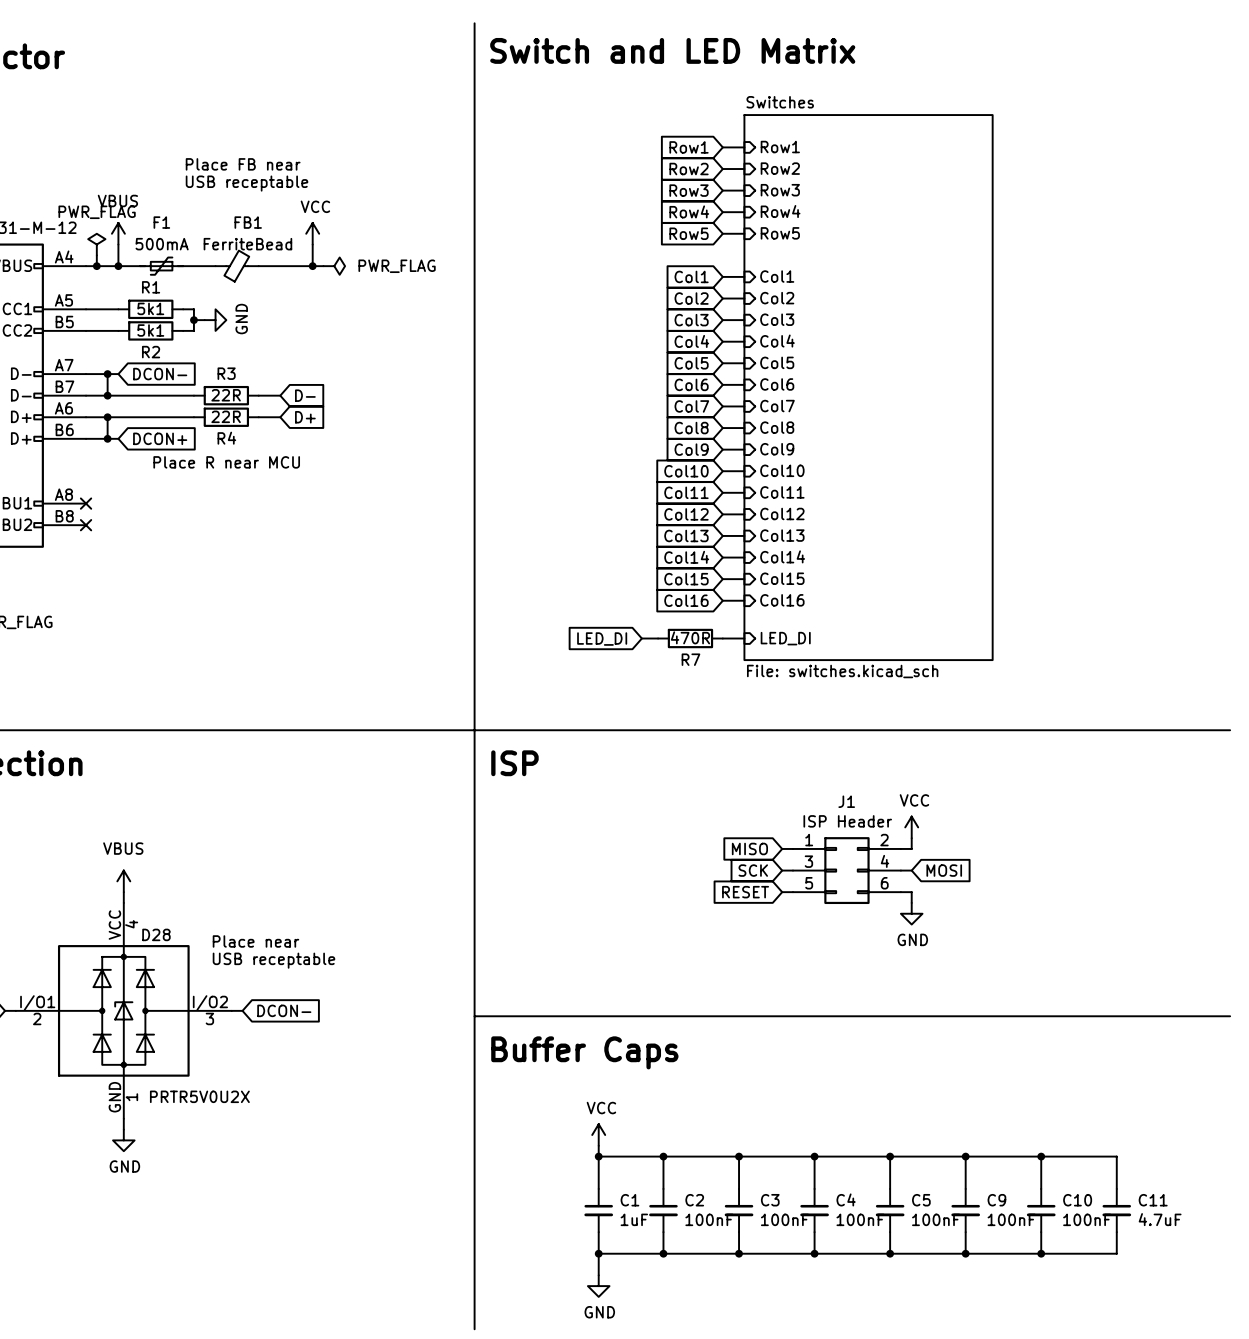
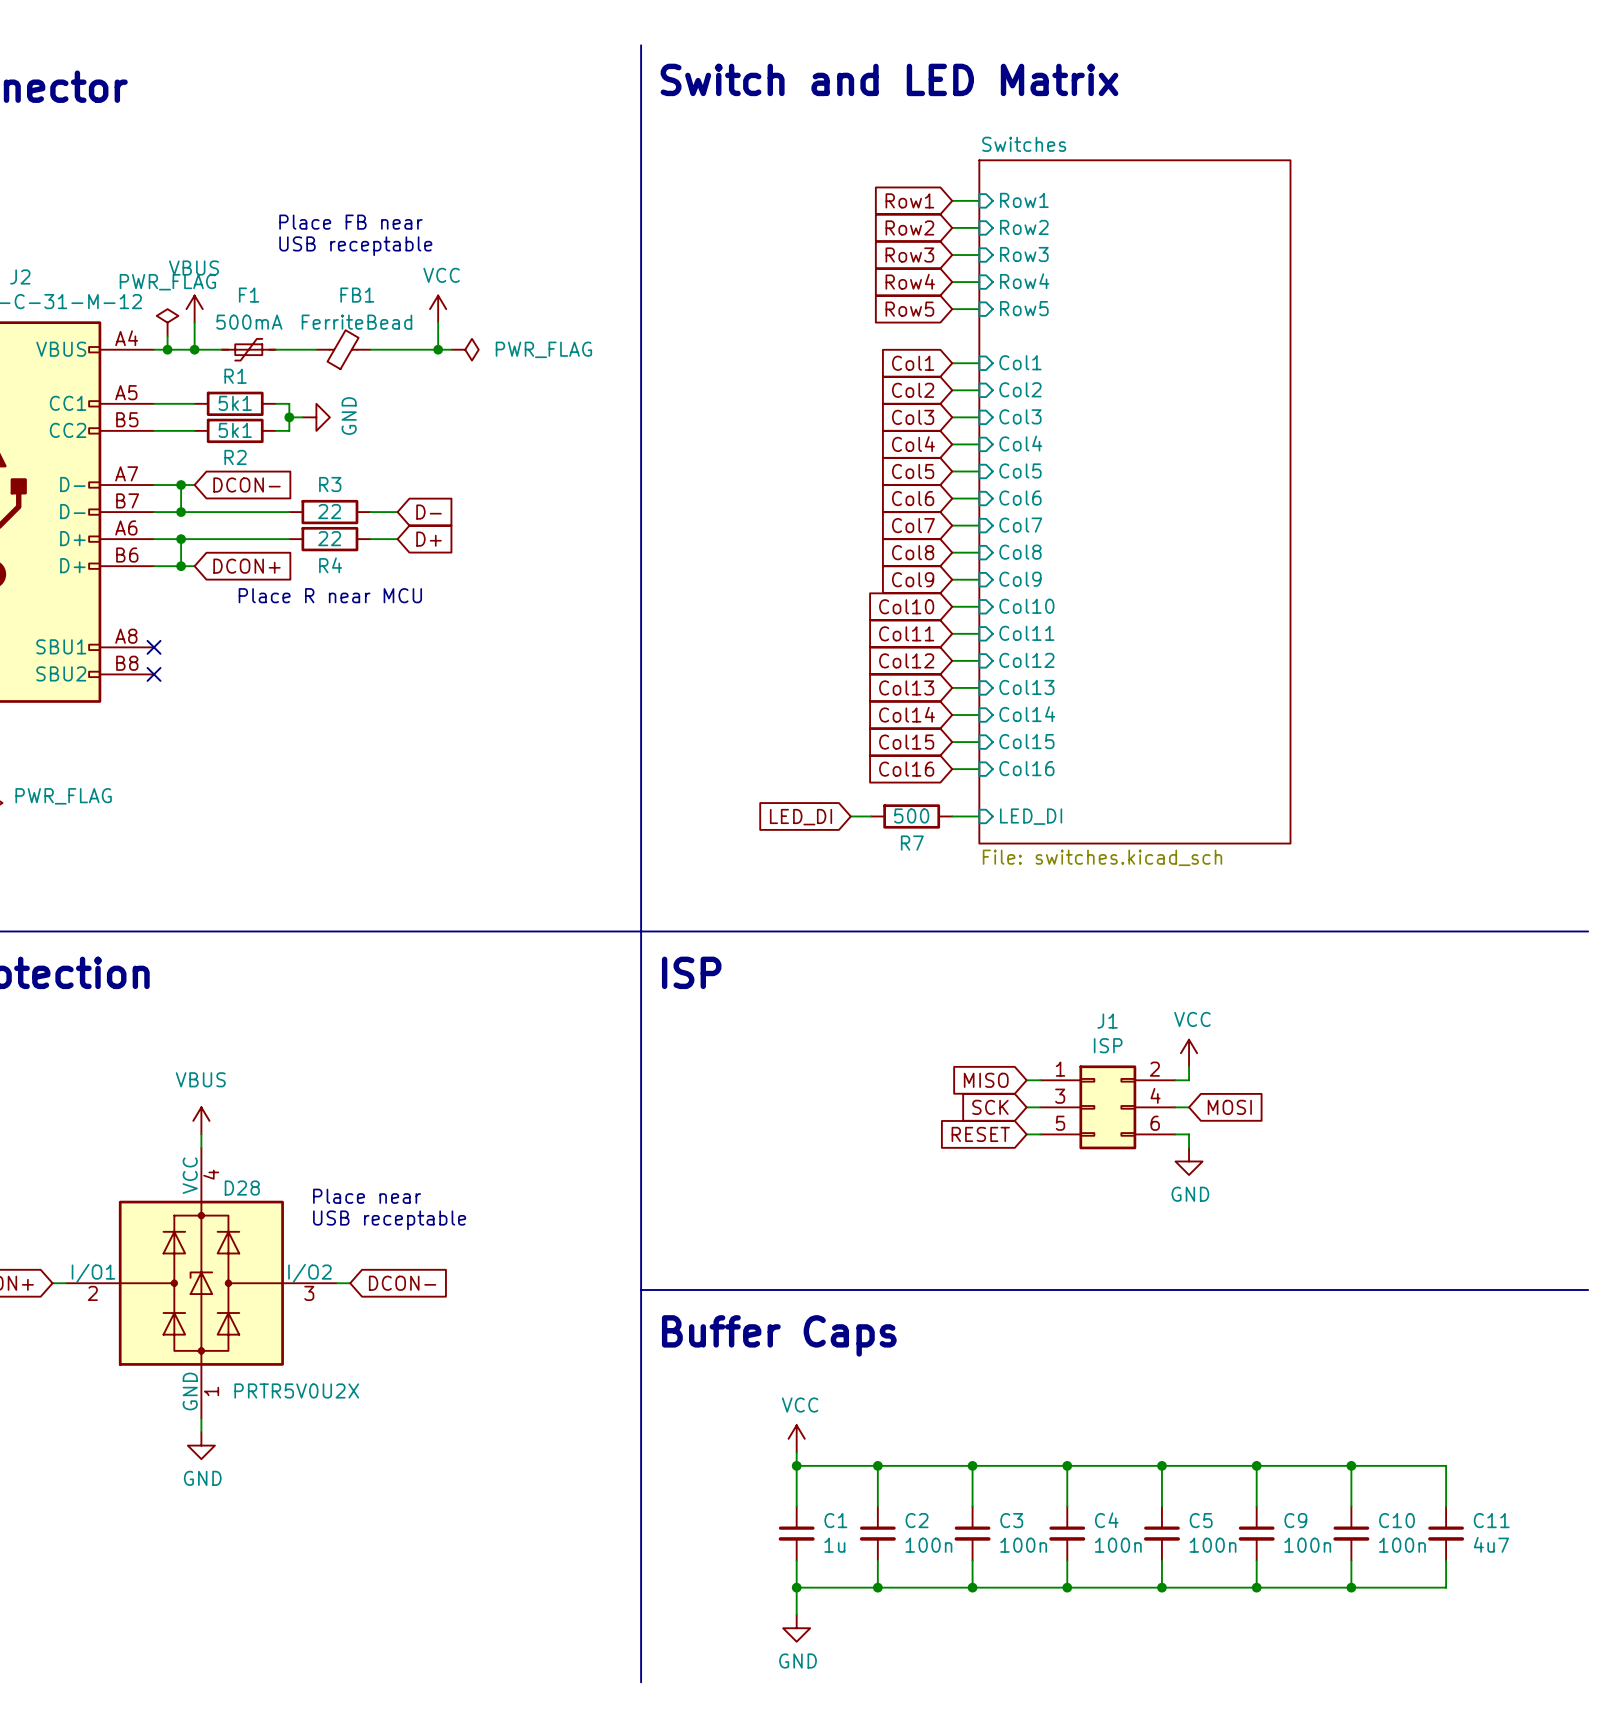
R3 value: 22R (226, 395) -> 22 (329, 511)
R4 value: 22R (226, 416) -> 22 (329, 538)
R7 value: 470R (690, 637) -> 500 (911, 815)
J1 value: ISP Header (847, 821) -> ISP (1108, 1045)
C1 value: 1uF (634, 1219) -> 1u (834, 1545)
C2 value: 100nF (709, 1219) -> 100n (928, 1545)
C3 value: 100nF (784, 1219) -> 100n (1023, 1545)
C4 value: 100nF (860, 1219) -> 100n (1118, 1545)
C5 value: 100nF (936, 1219) -> 100n (1213, 1545)
C9 value: 100nF (1011, 1219) -> 100n (1307, 1545)
C10 value: 100nF (1087, 1219) -> 100n (1402, 1545)
C11 value: 4.7uF (1160, 1219) -> 4u7 (1491, 1544)

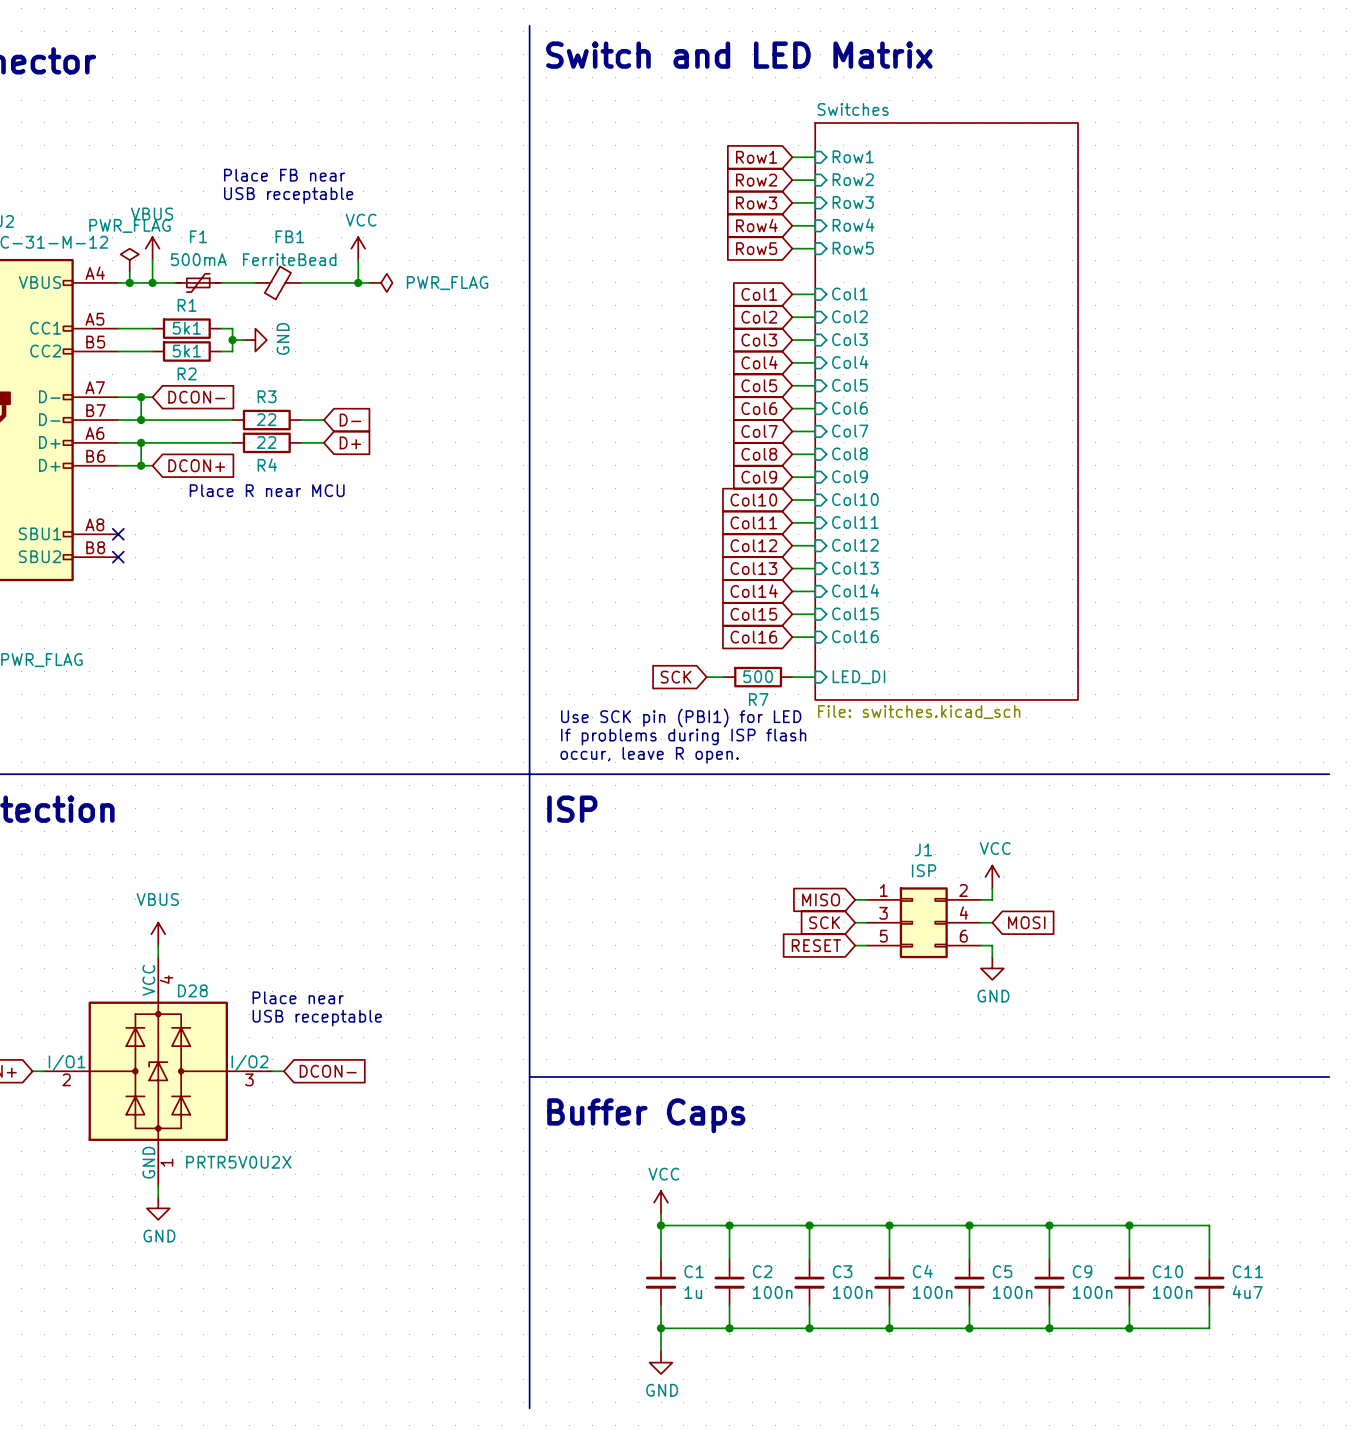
global label: LED_DI (801, 817) -> SCK (676, 677)
text: none -> Use SCK pin (PBI1) for LED (681, 718)
text: none -> If problems during ISP flash (683, 736)
text: none -> occur, leave R open. (649, 755)

